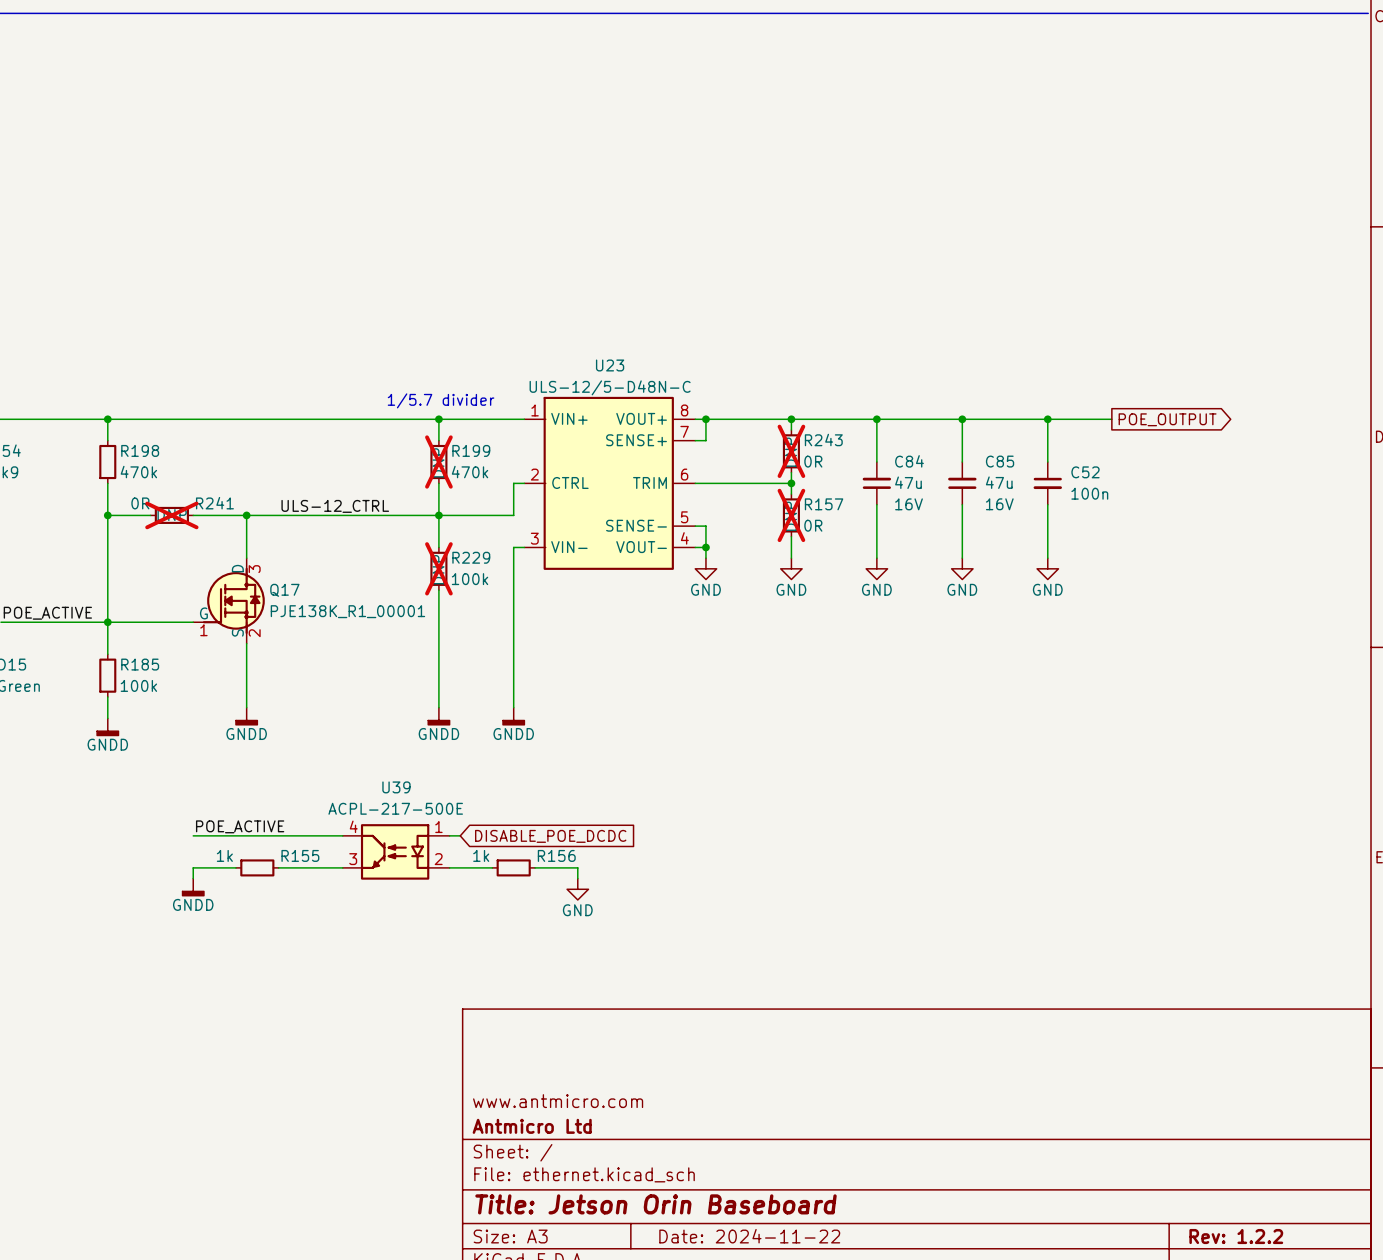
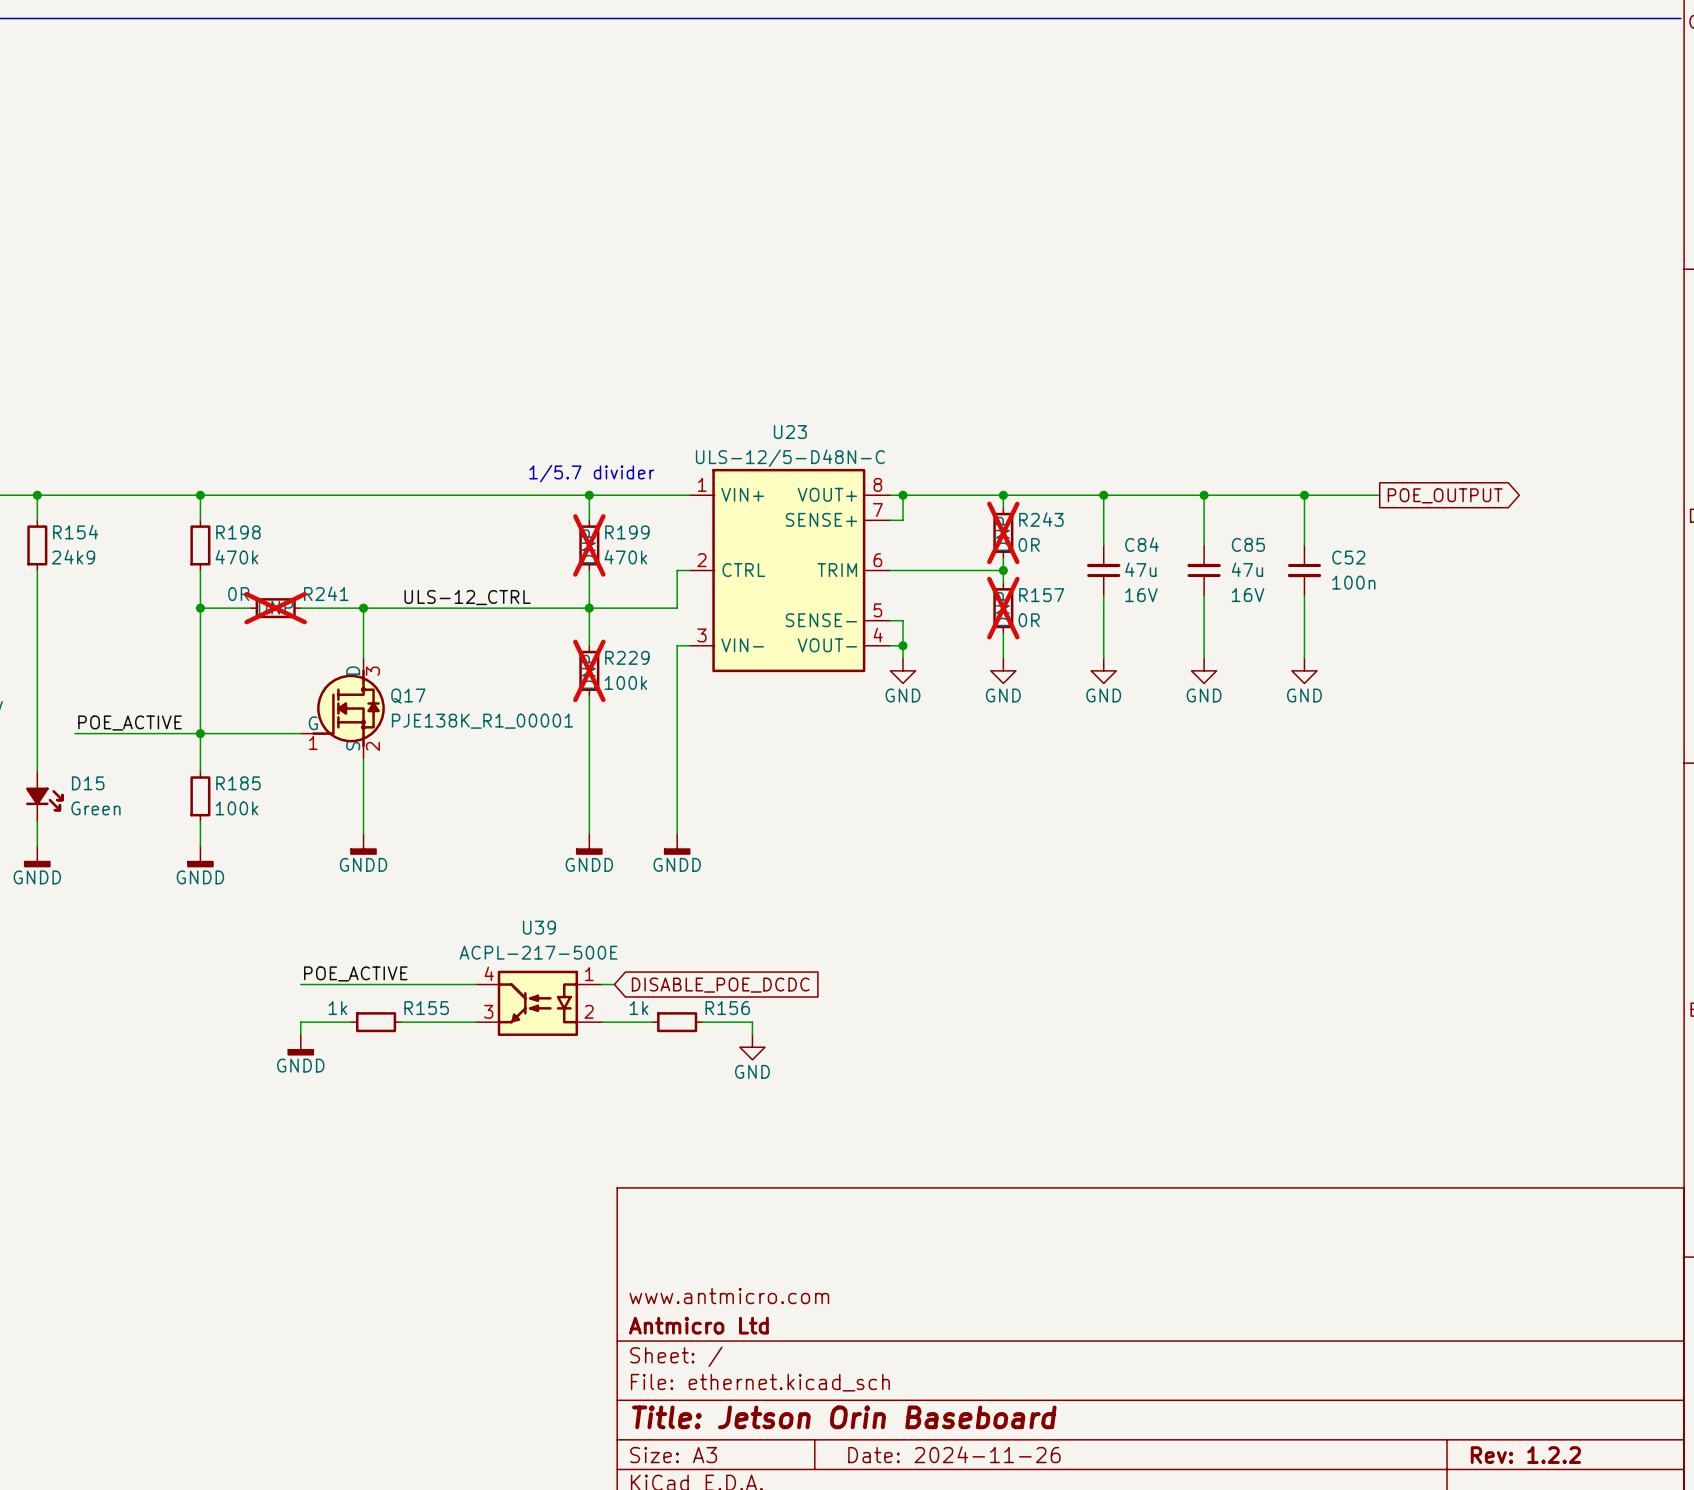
title block: Date: 2024-11-22 (749, 1236) -> Date: 2024-11-26 (954, 1454)

